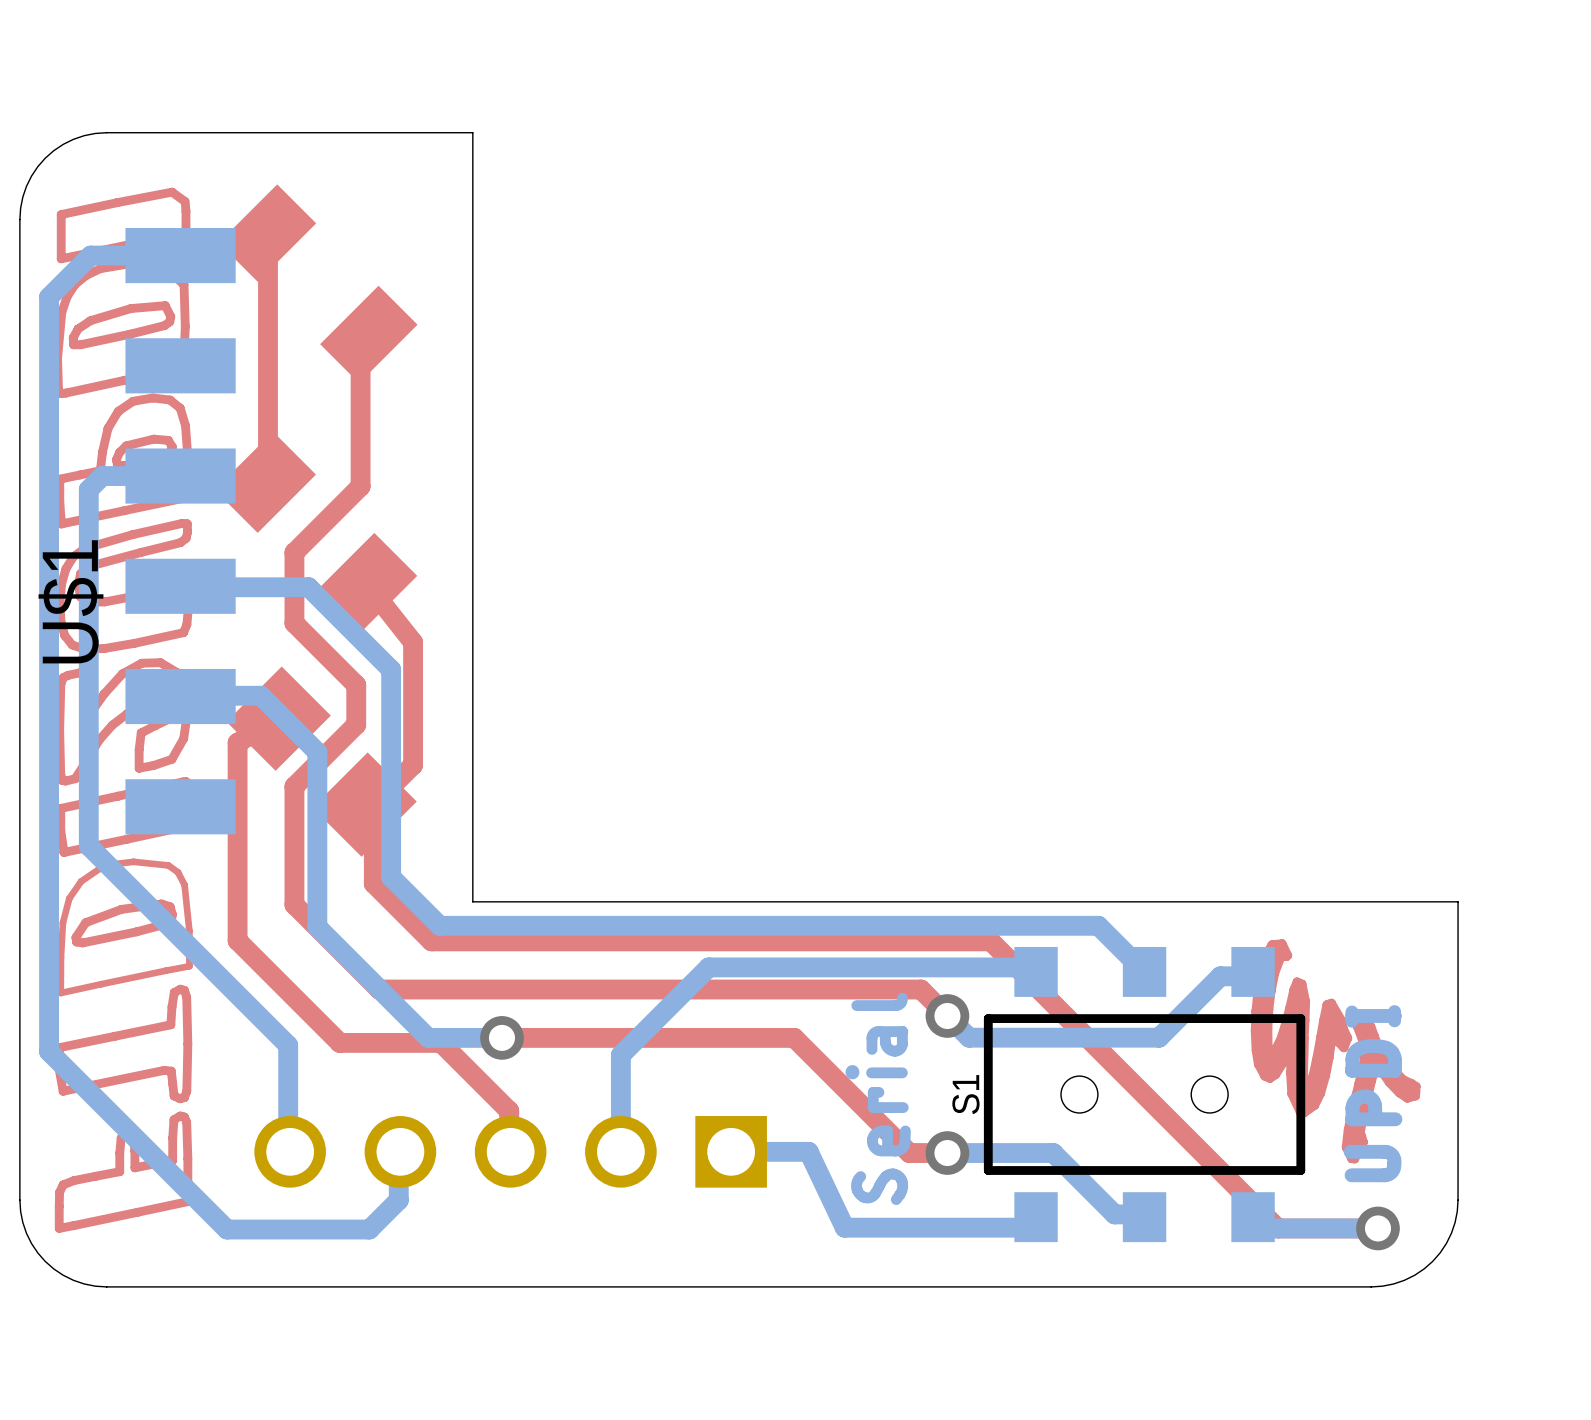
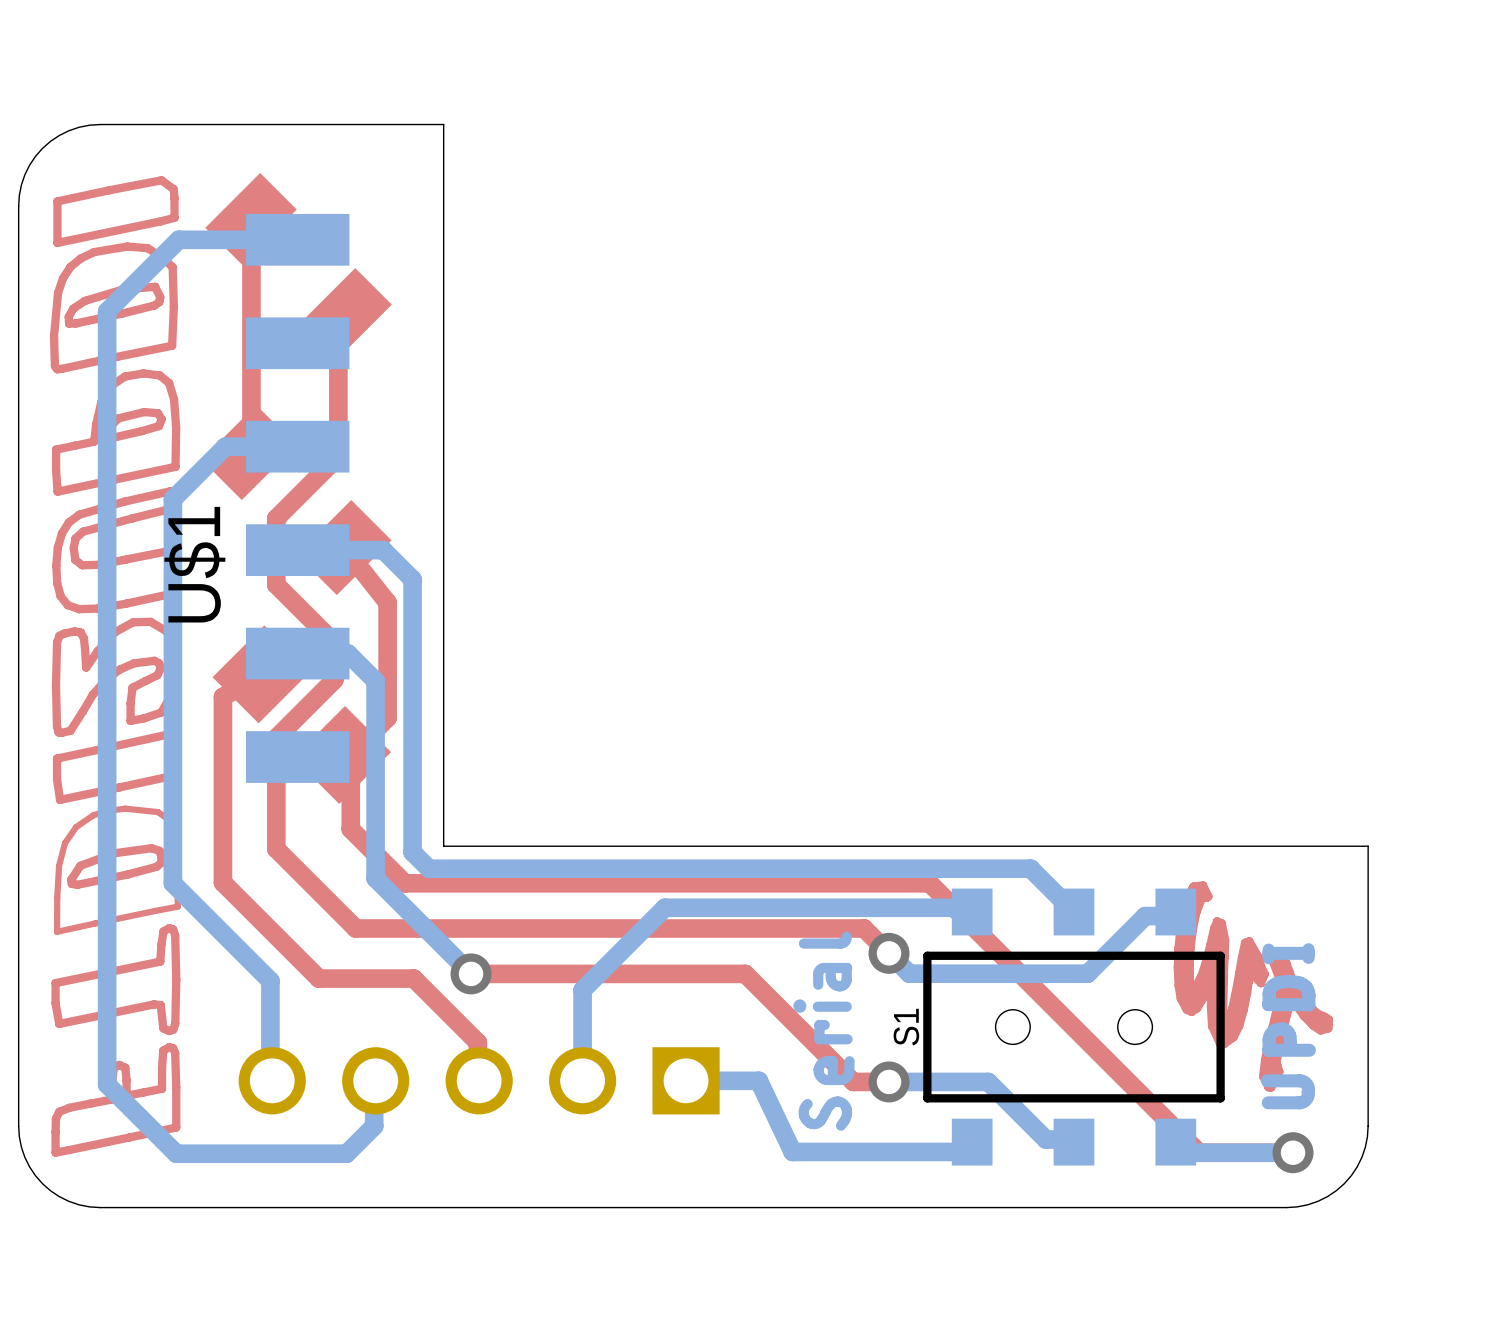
bottom track: (180, 255) (90, 255) (49, 297) (49, 1051) (227, 1229) -> (297, 239) (178, 239) (107, 311) (107, 1084) (176, 1153) (213, 1153)
bottom track: (180, 476) (102, 476) (88, 489) (88, 845) (184, 941) -> (297, 446) (225, 446) (172, 499) (172, 883)
U$1 position: (180, 531) -> (297, 498)
bottom track: (178, 587) (308, 587) (391, 669) (391, 877) (439, 925) (457, 925) -> (297, 550) (383, 550) (412, 579) (412, 852) (428, 868)
bottom track: (165, 695) (260, 695) (317, 752) (317, 927) (428, 1037) (501, 1037) -> (297, 653) (348, 653) (375, 681) (375, 878) (471, 973)

